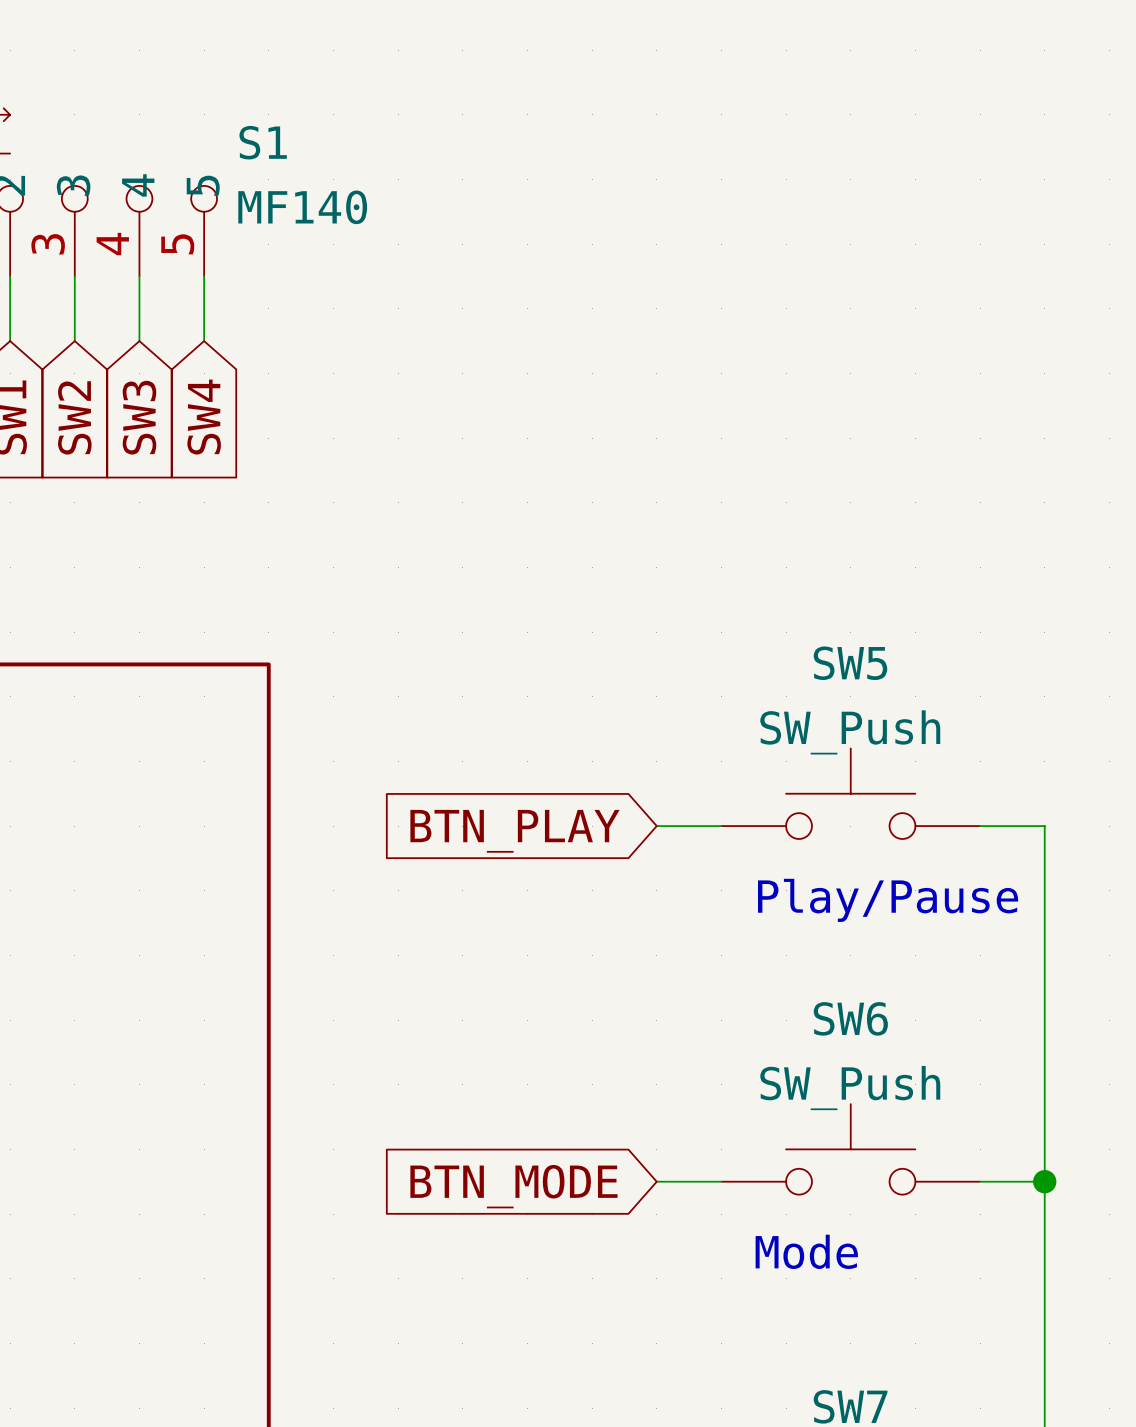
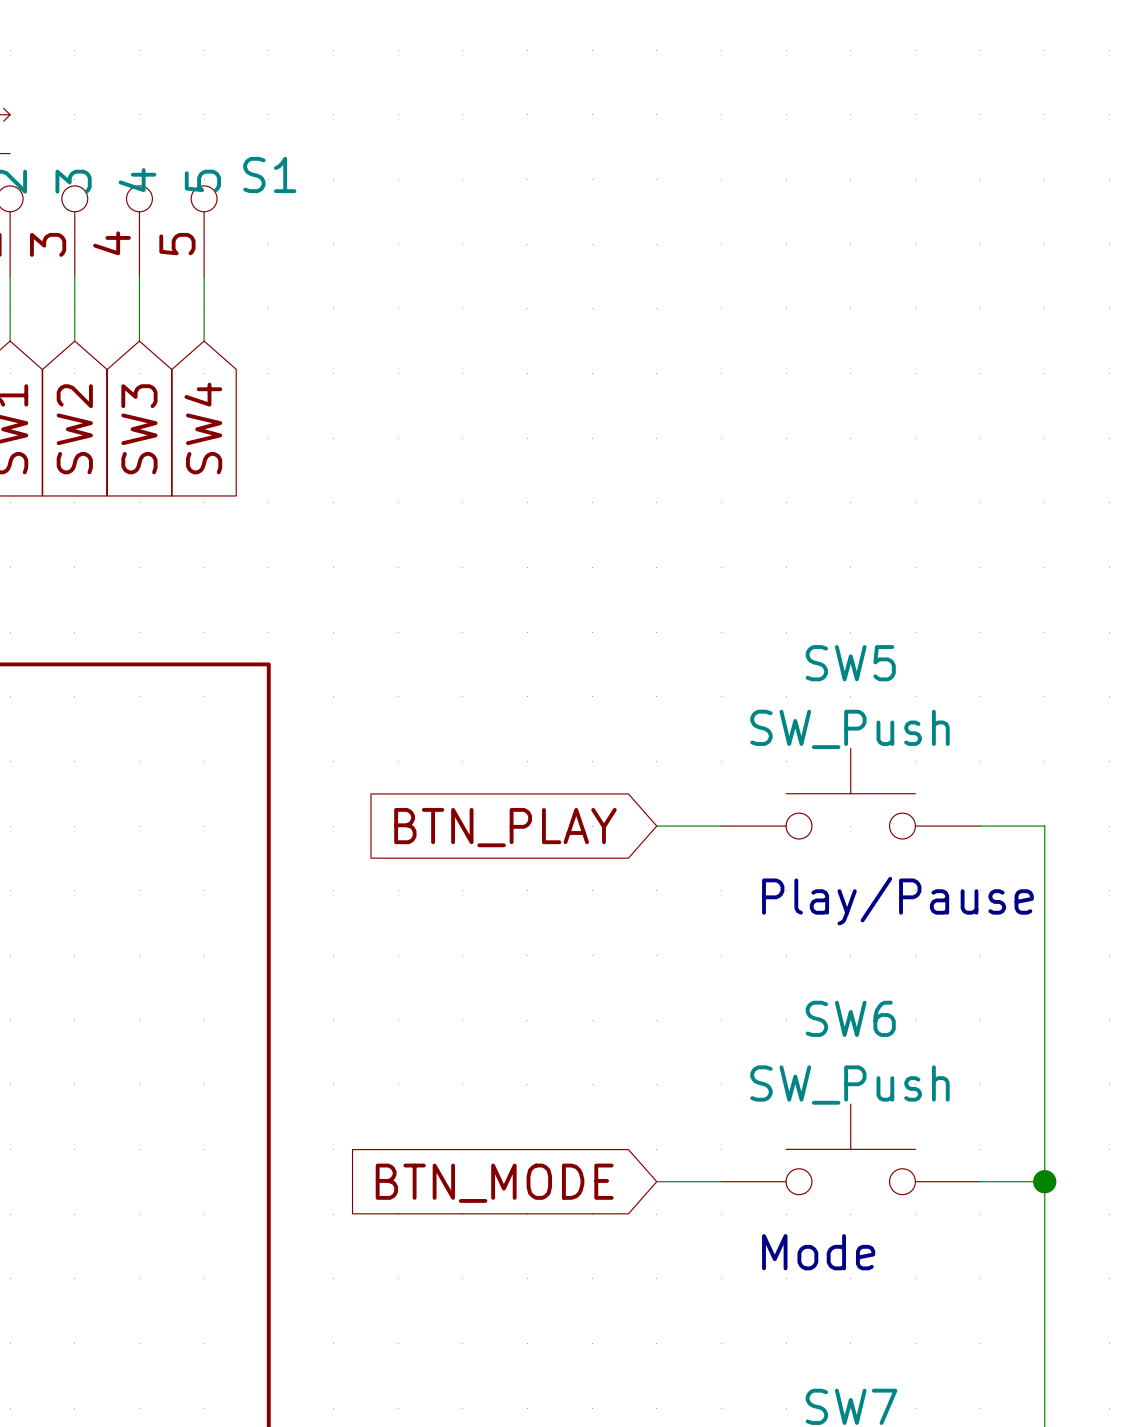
S1 name position: S1 (263, 142) -> S1 (269, 174)
S1 value: MF140 (302, 207) -> none

